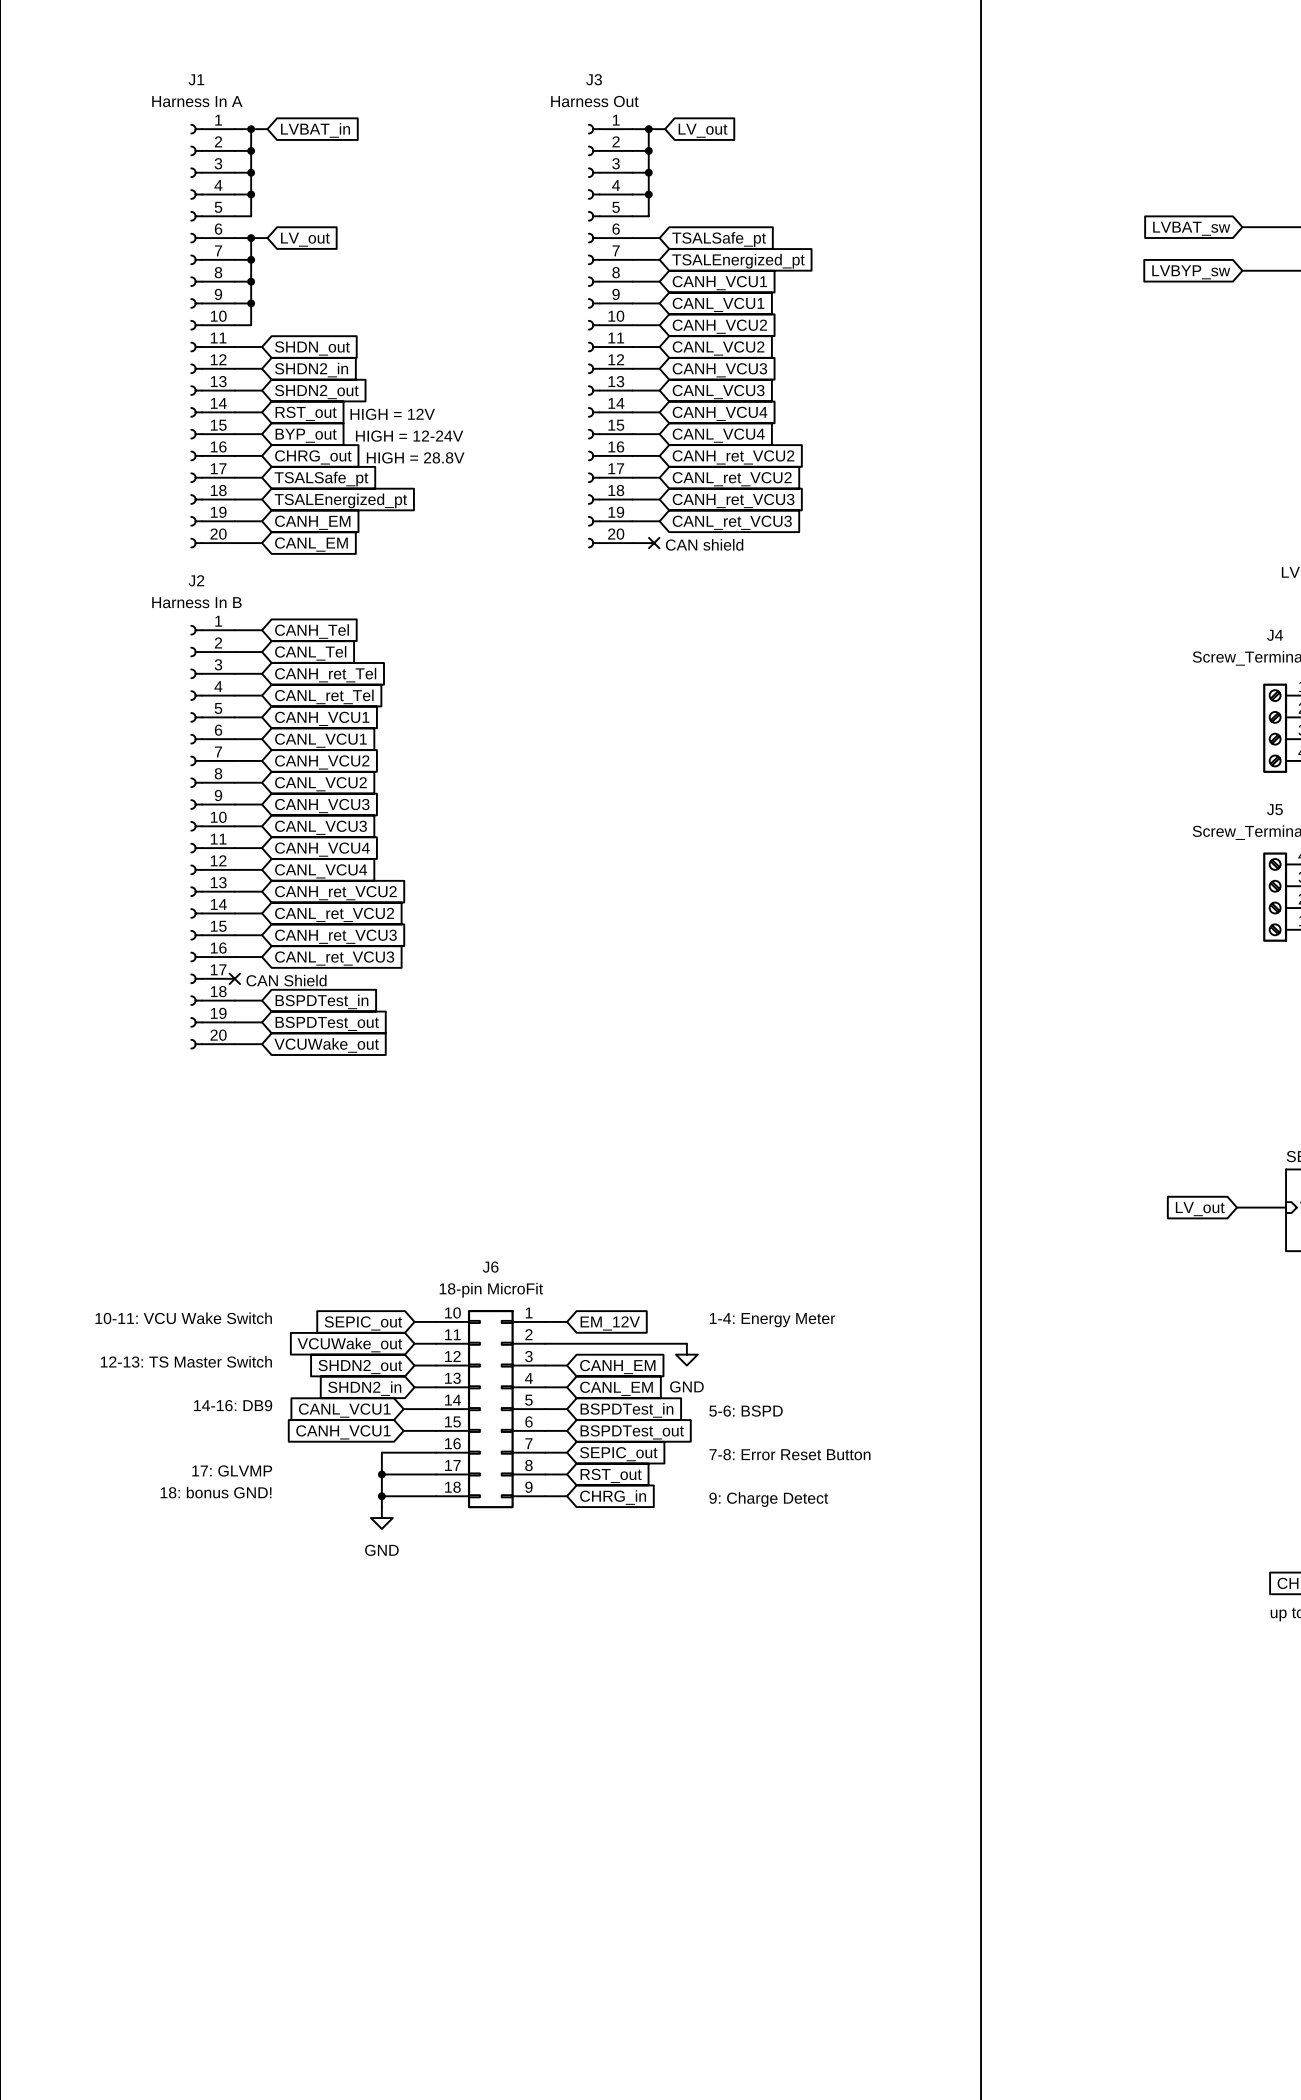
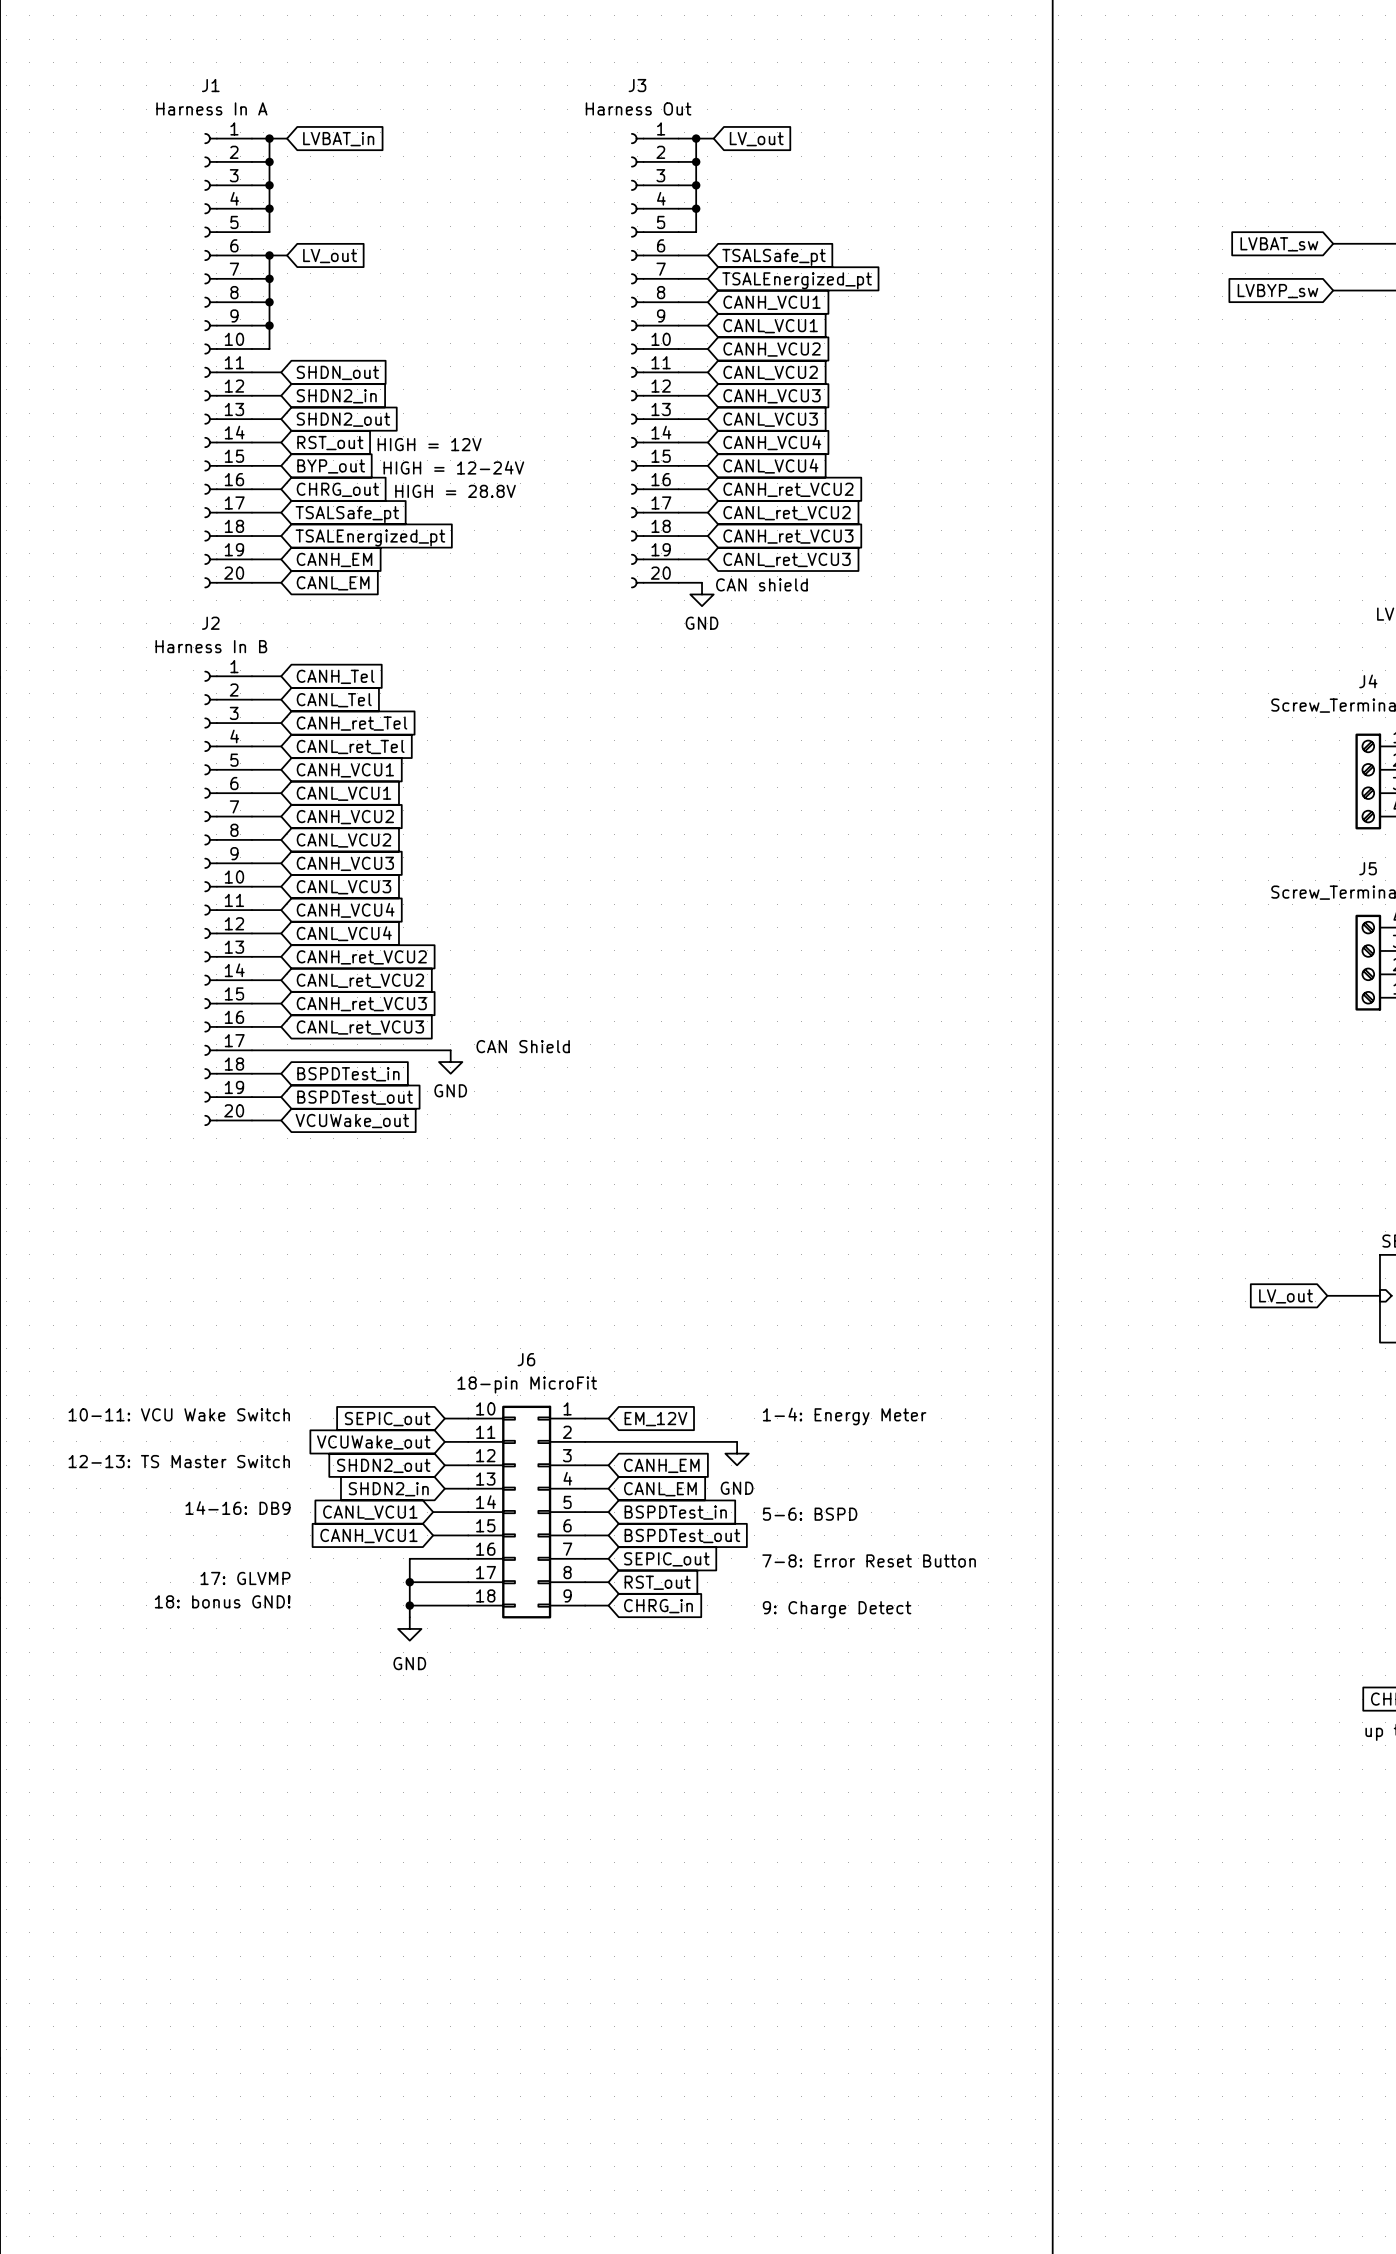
no-connect mark: (654, 543) -> none
power symbol: none -> GND (702, 594)
wire: none -> (251, 1050) (450, 1050)
no-connect mark: (234, 978) -> none
text position: CAN Shield (286, 980) -> CAN Shield (523, 1046)
power symbol: none -> GND (450, 1062)

